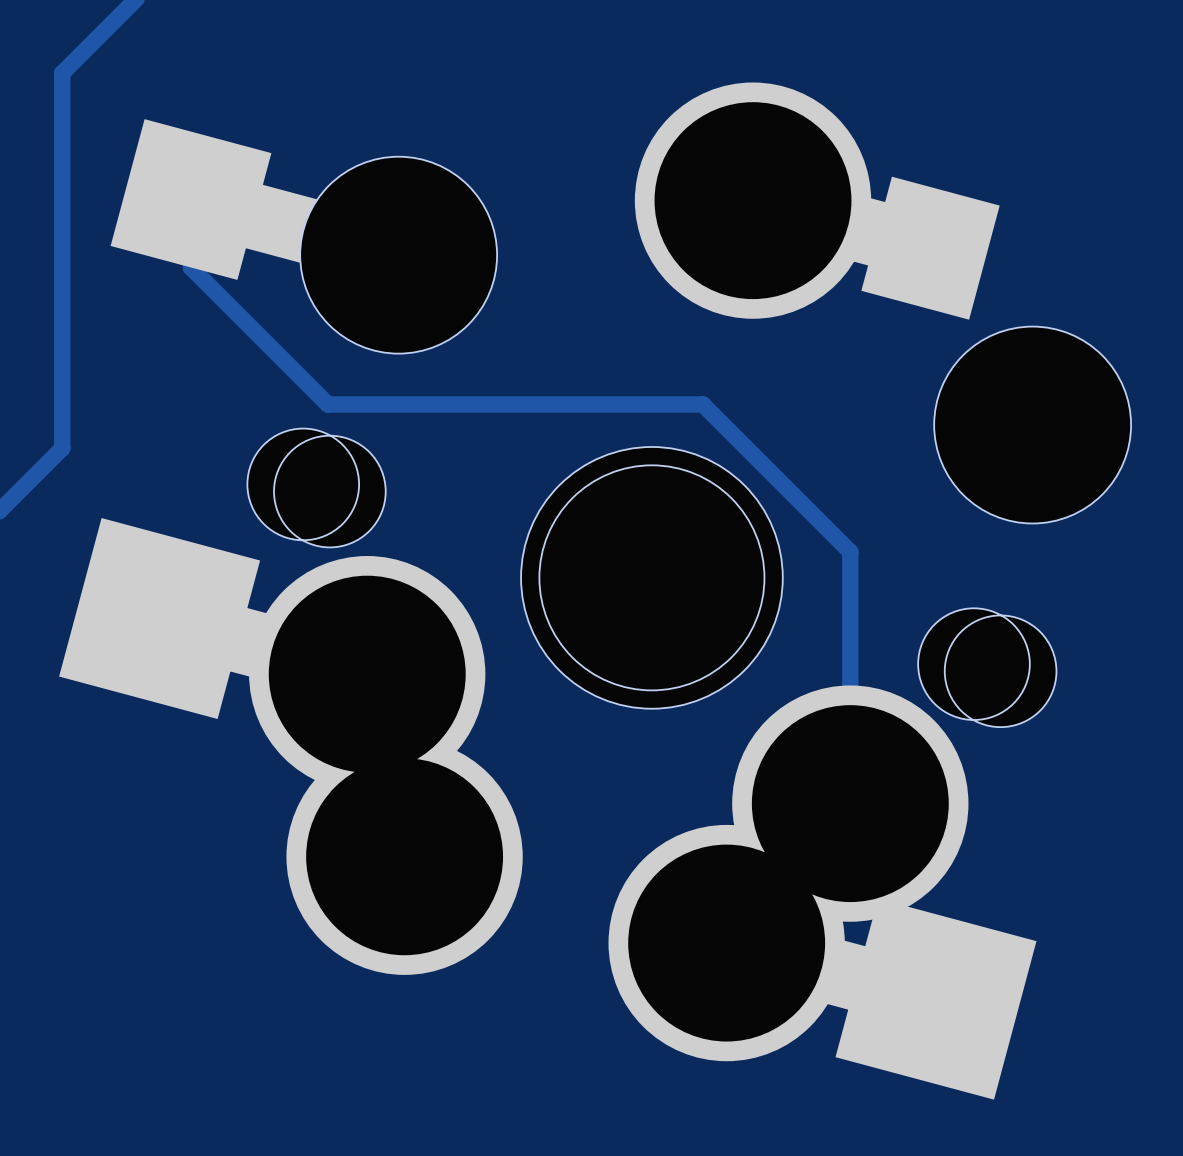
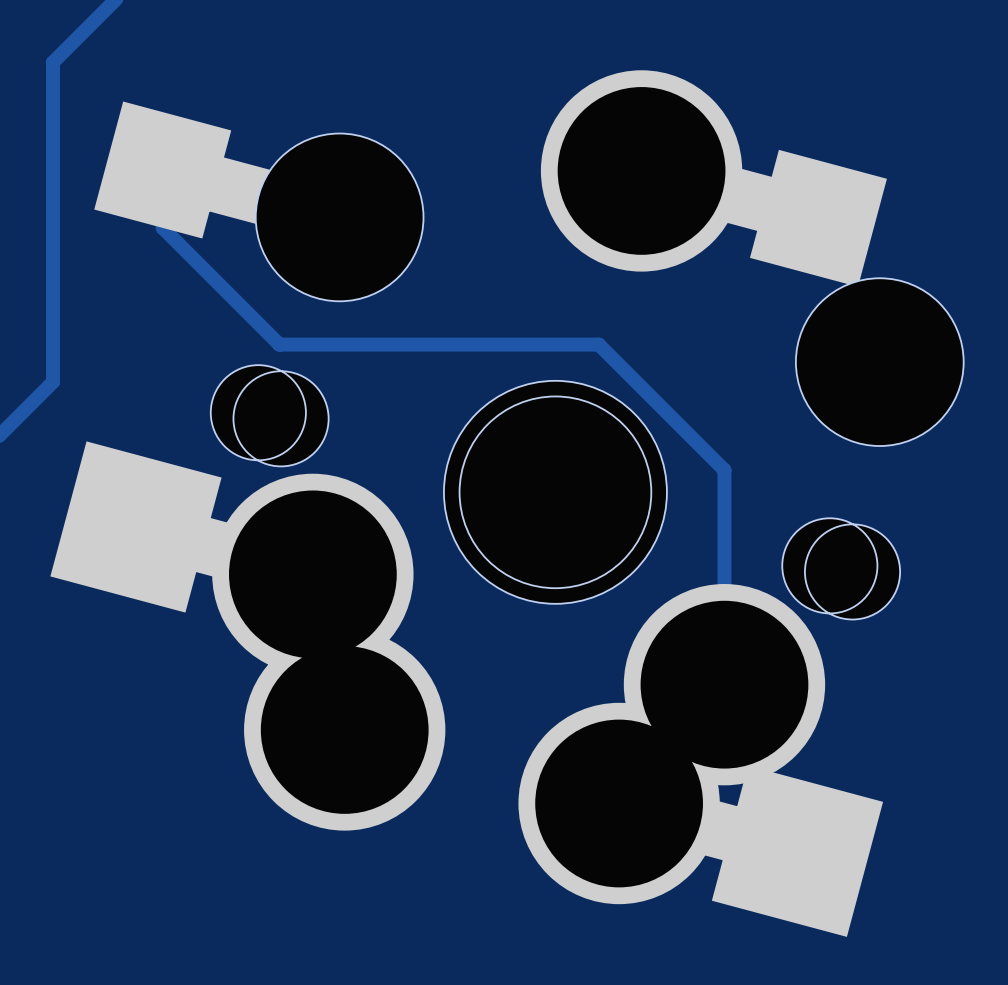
part footprint: [59, 82, 1132, 1100] -> [50, 70, 964, 937]

